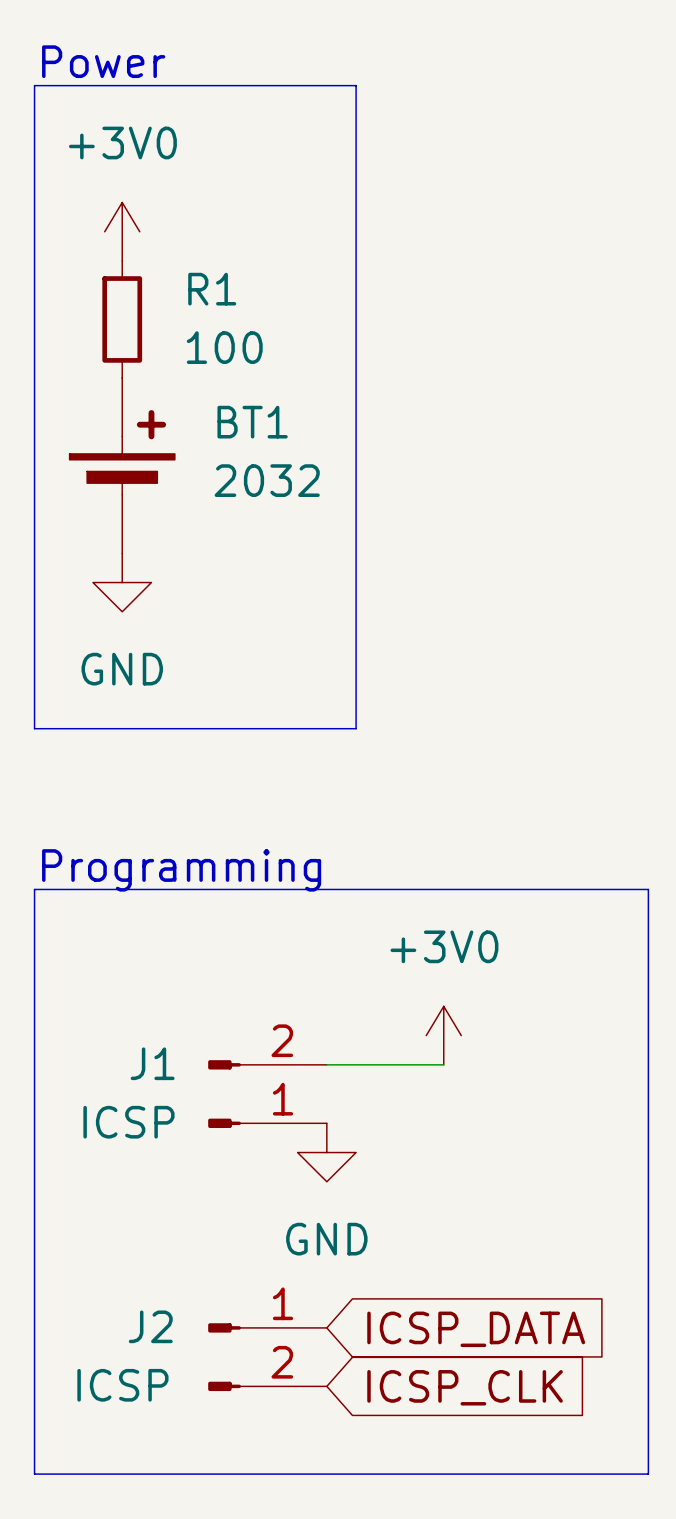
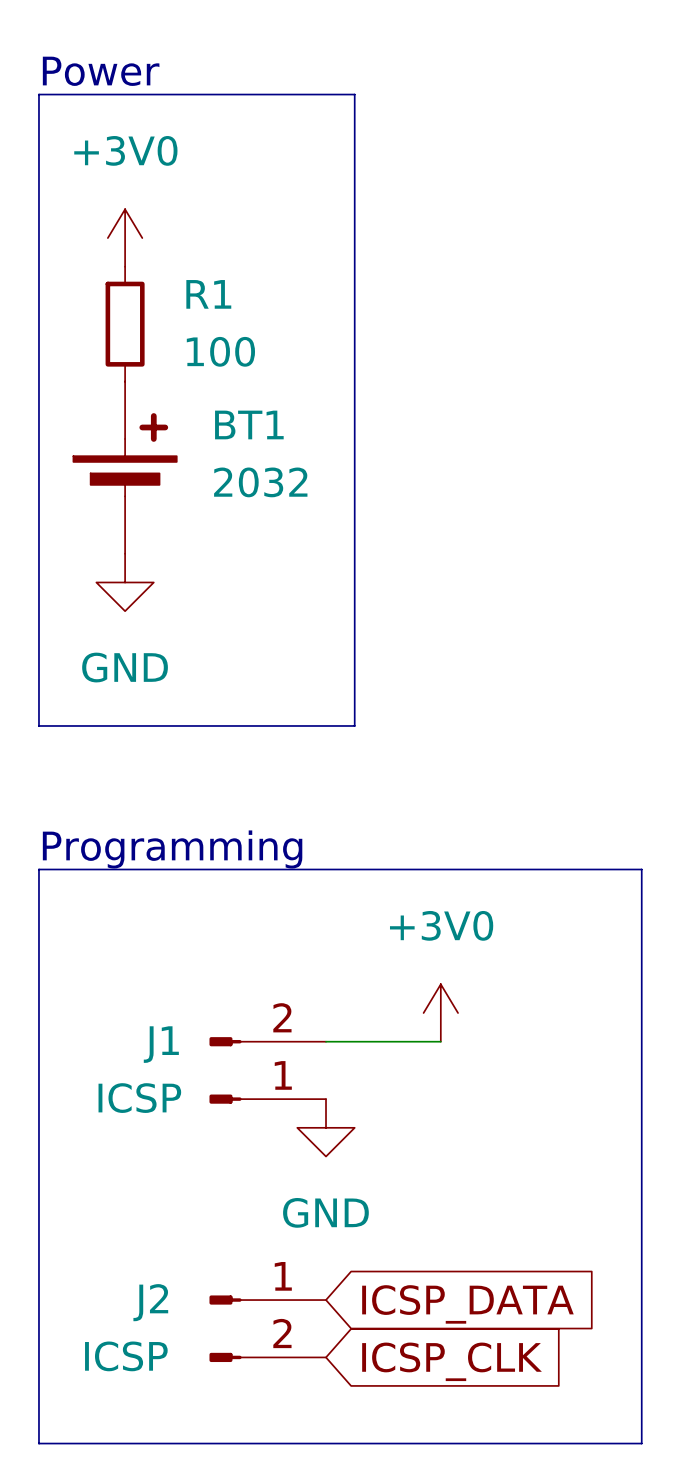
text position: Power (103, 61) -> Power (101, 71)
line: (34, 100) (34, 85) (356, 85) (356, 100) -> (38, 94) (354, 94)
power symbol position: +3V0 (122, 231) -> +3V0 (125, 238)
R1 position: (122, 319) -> (125, 324)
BT1 position: (122, 465) -> (125, 467)
power symbol position: GND (122, 582) -> GND (125, 582)
line: (34, 728) (356, 728) -> (38, 711) (38, 725) (354, 725) (354, 711)

